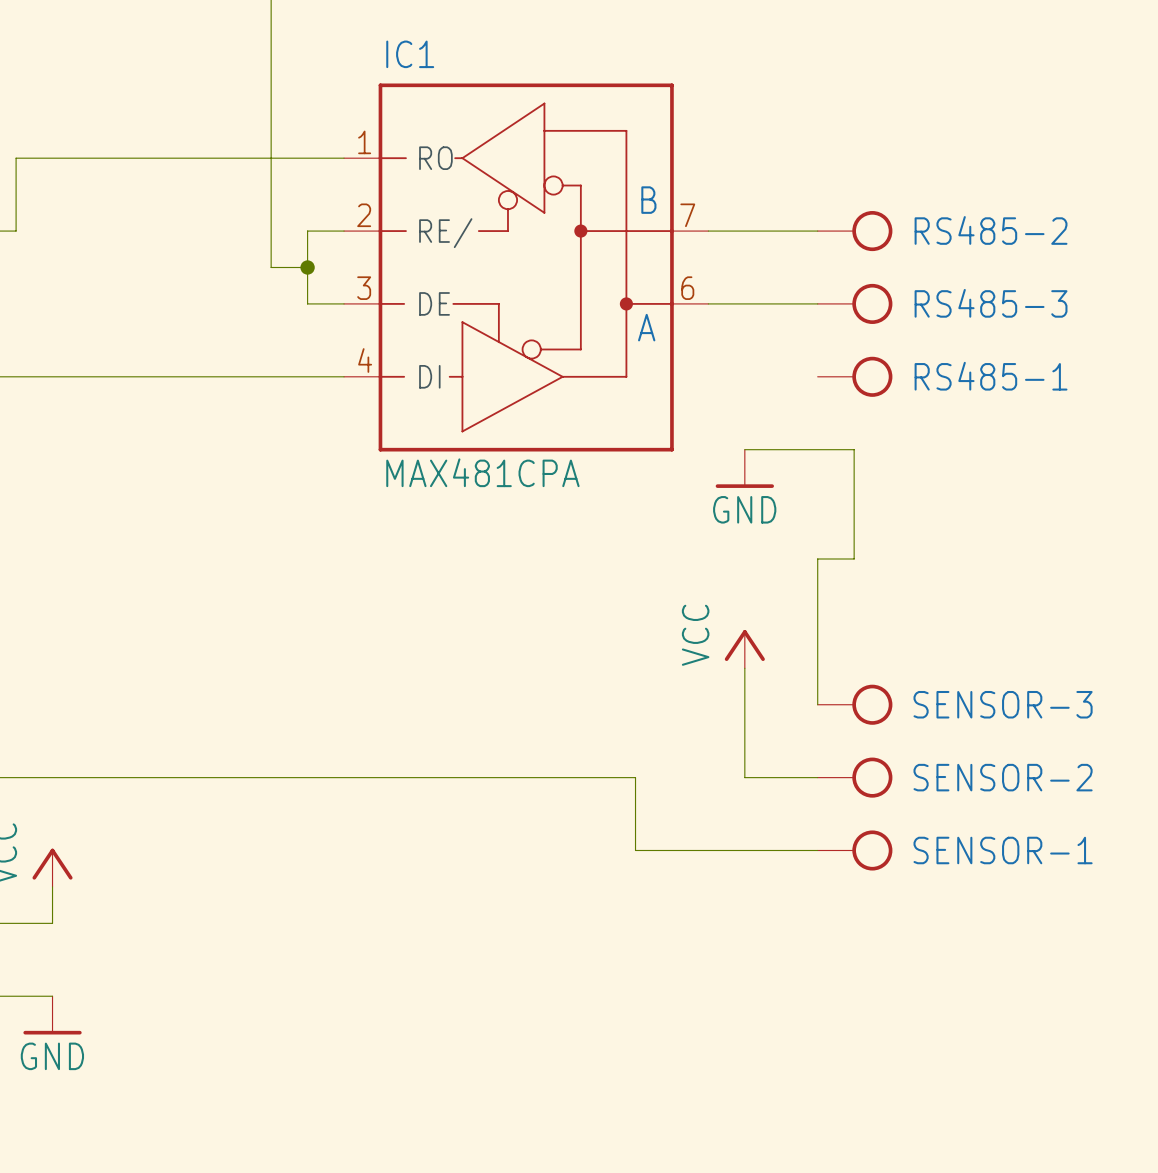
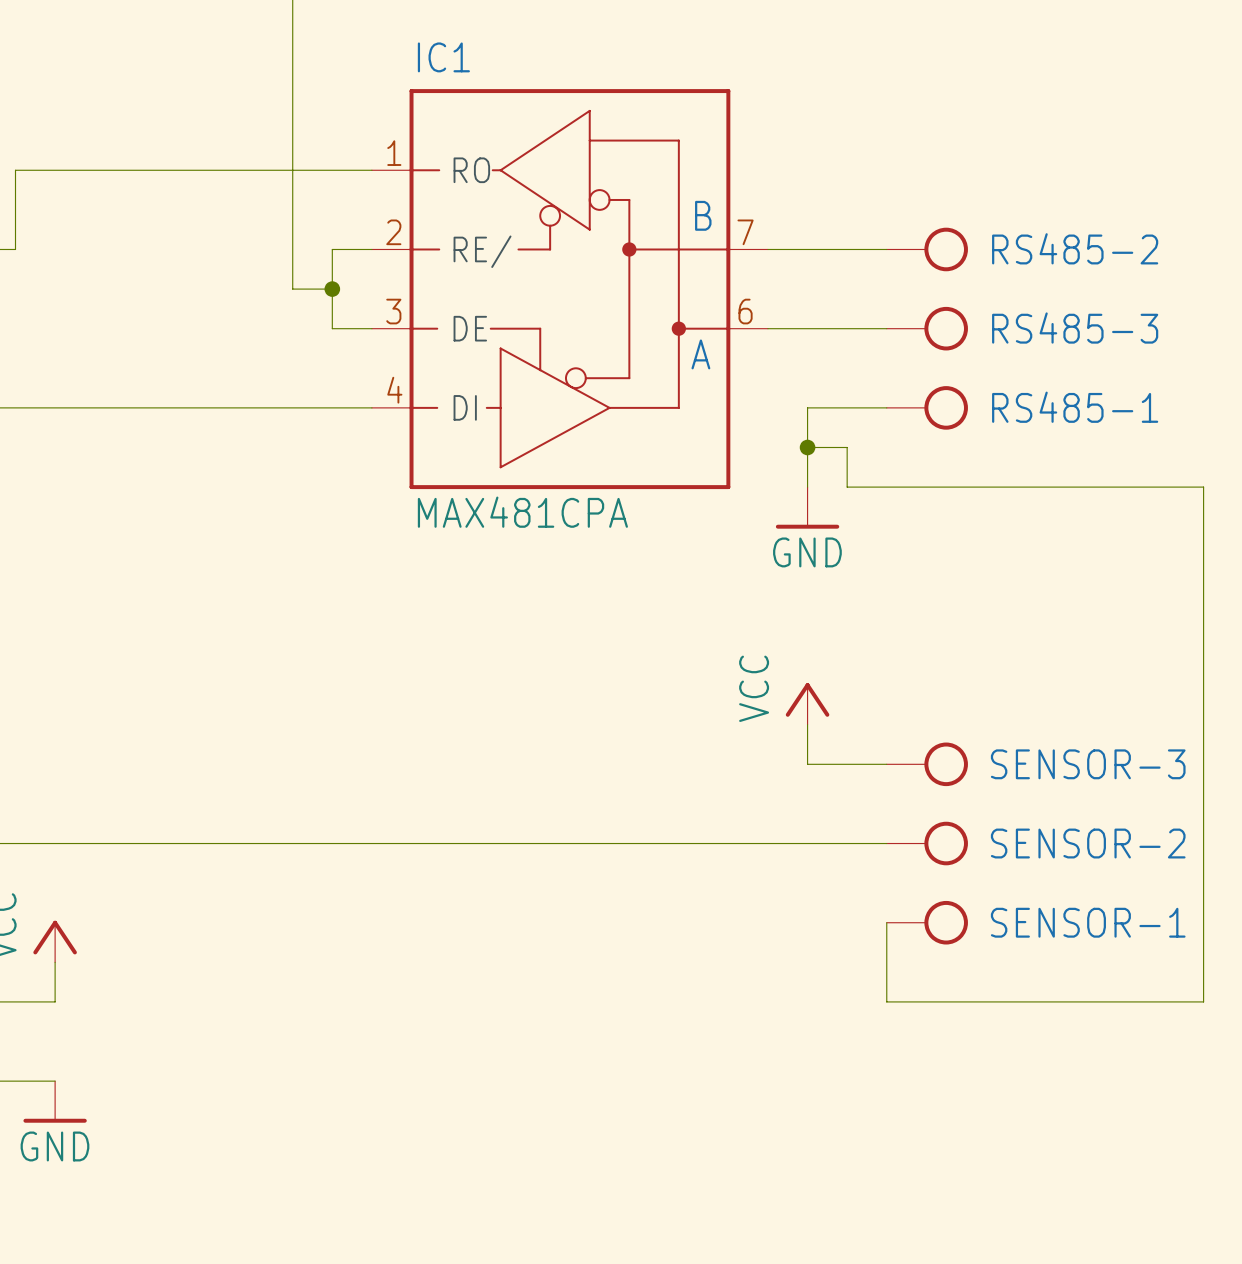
wire: none -> (886, 407) (807, 407) (807, 487)
junction: none -> (807, 447)
wire: (744, 449) (781, 449) -> (807, 447) (847, 447) (847, 487)
wire: (854, 449) (854, 558) (817, 558) (817, 704) -> (926, 487) (1203, 487) (1203, 1001) (886, 1001) (886, 922)
wire: (744, 704) (744, 777) -> (807, 764) (886, 764)
wire: (635, 777) (635, 850) (817, 850) -> (688, 843) (807, 843)

